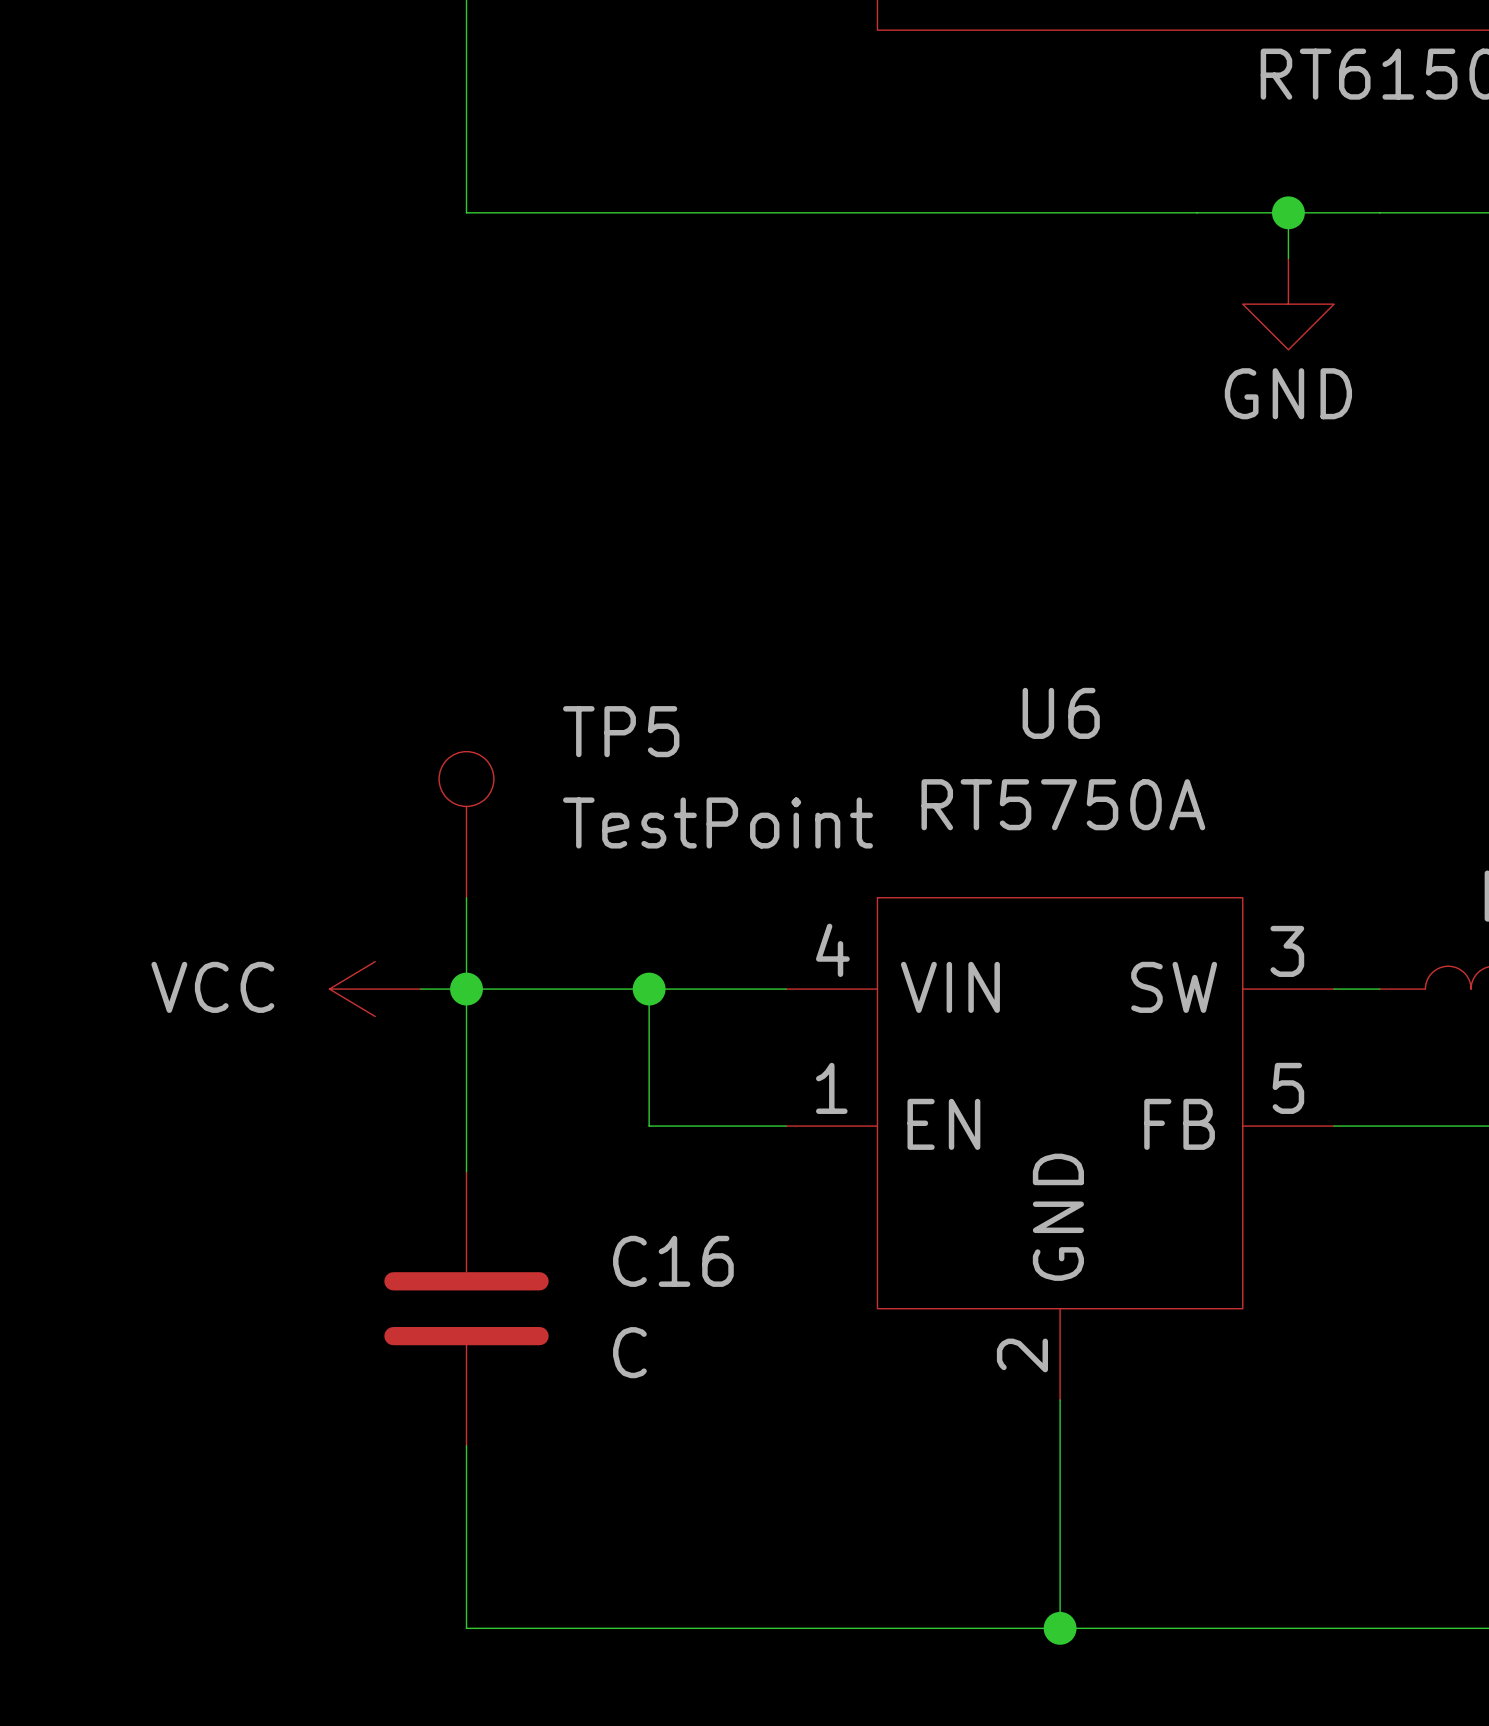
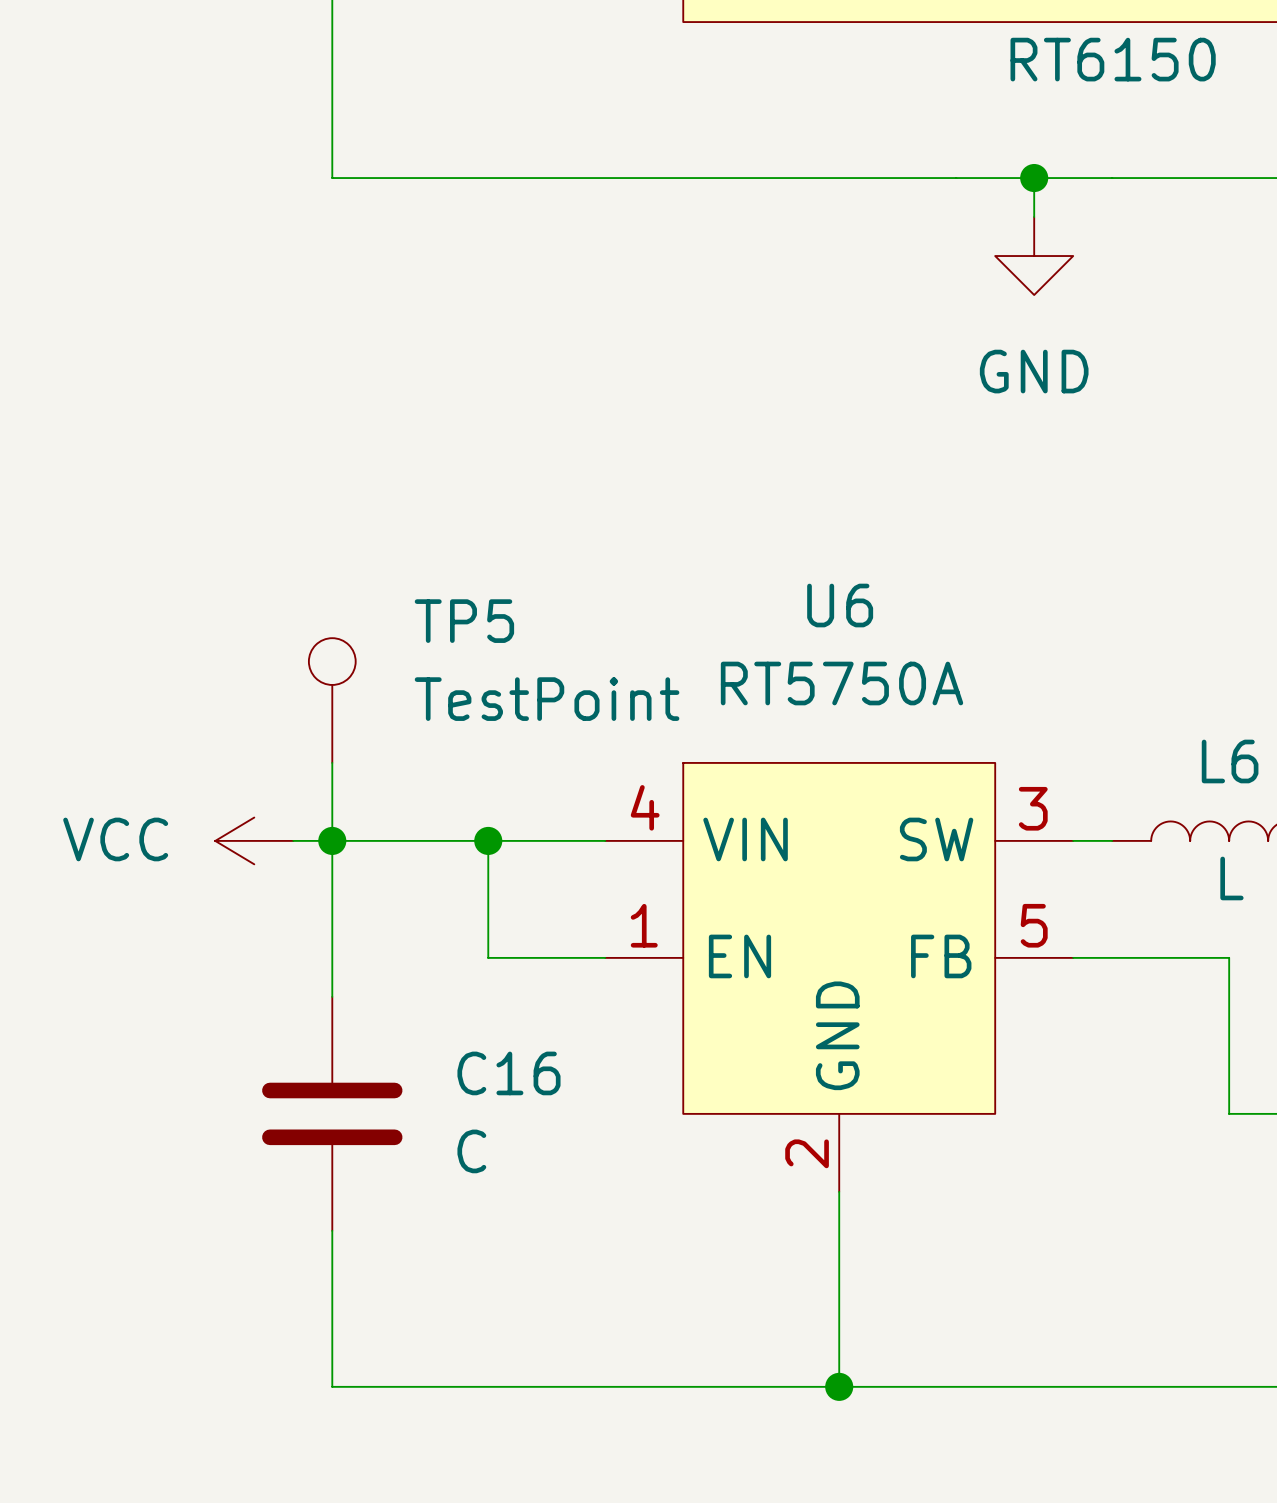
power symbol text position: GND (1288, 393) -> GND (1034, 371)

